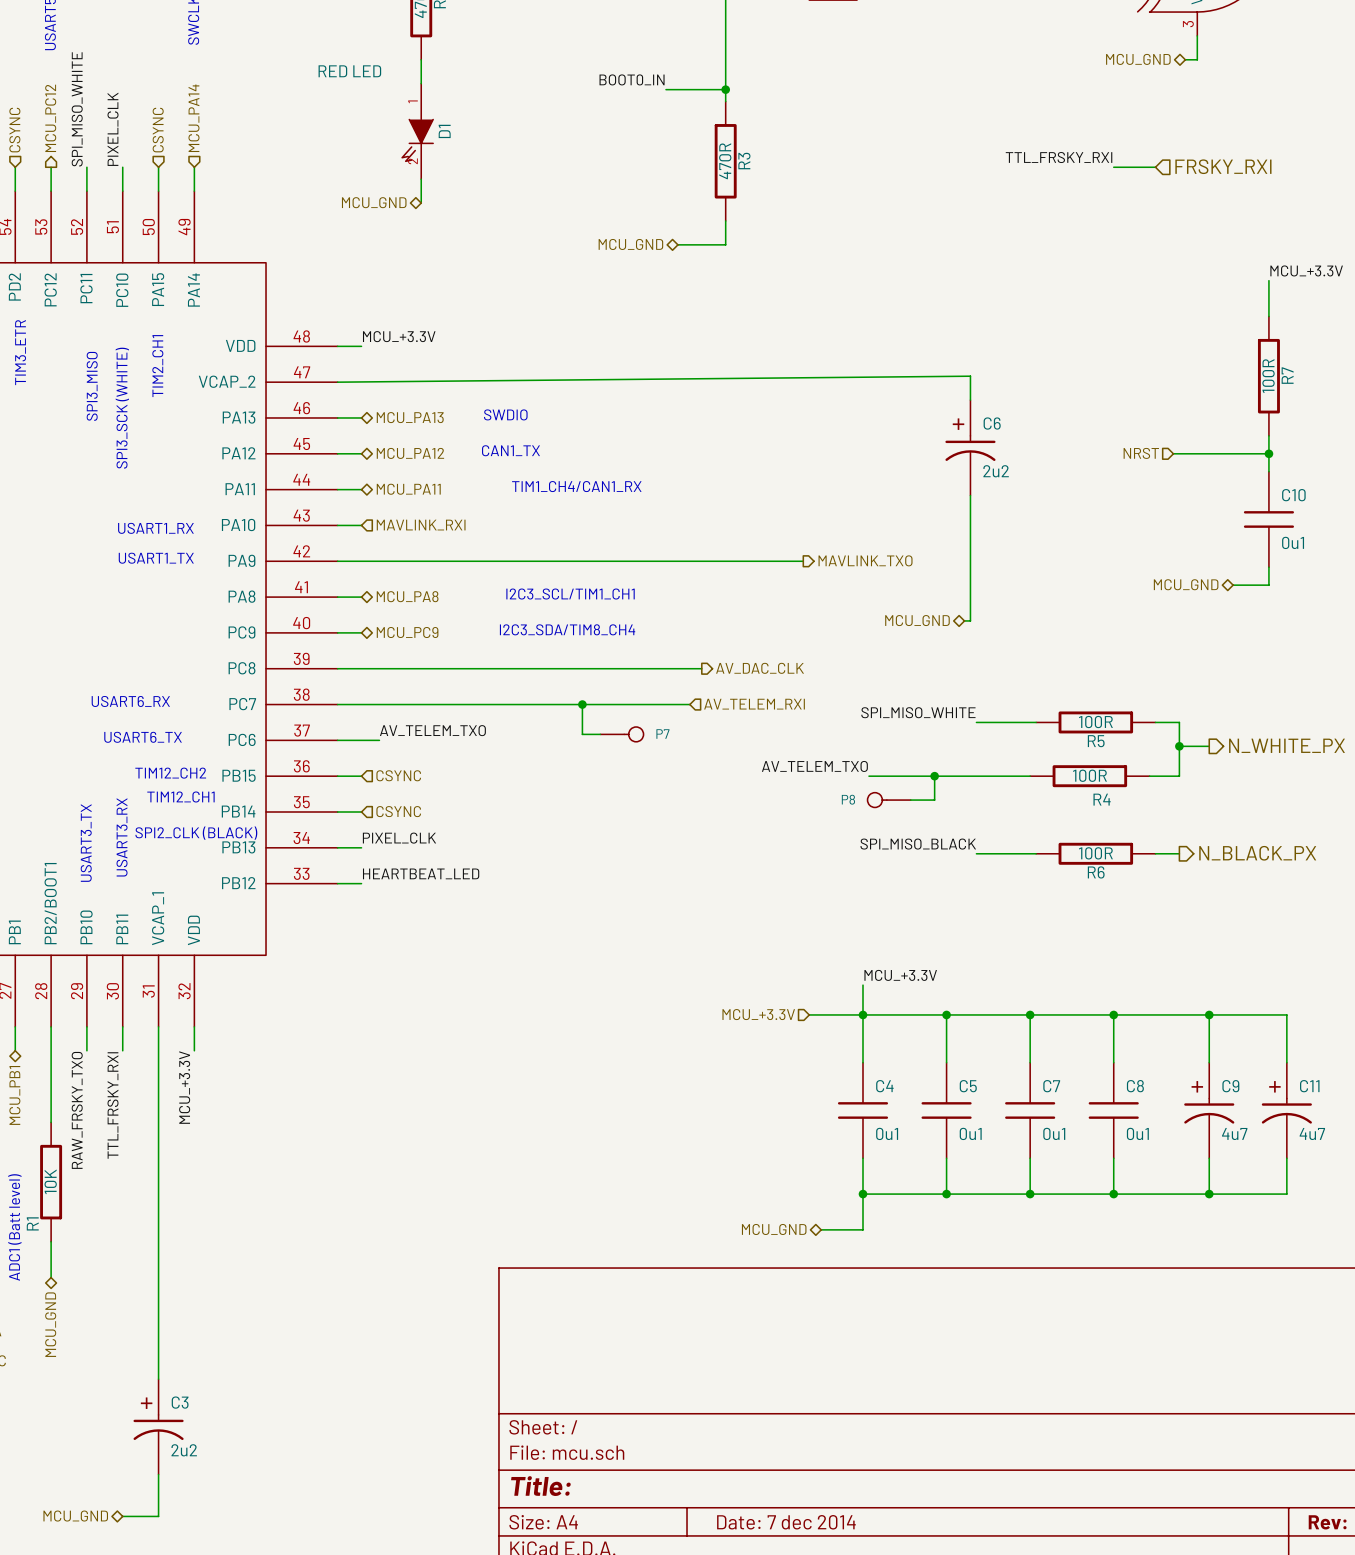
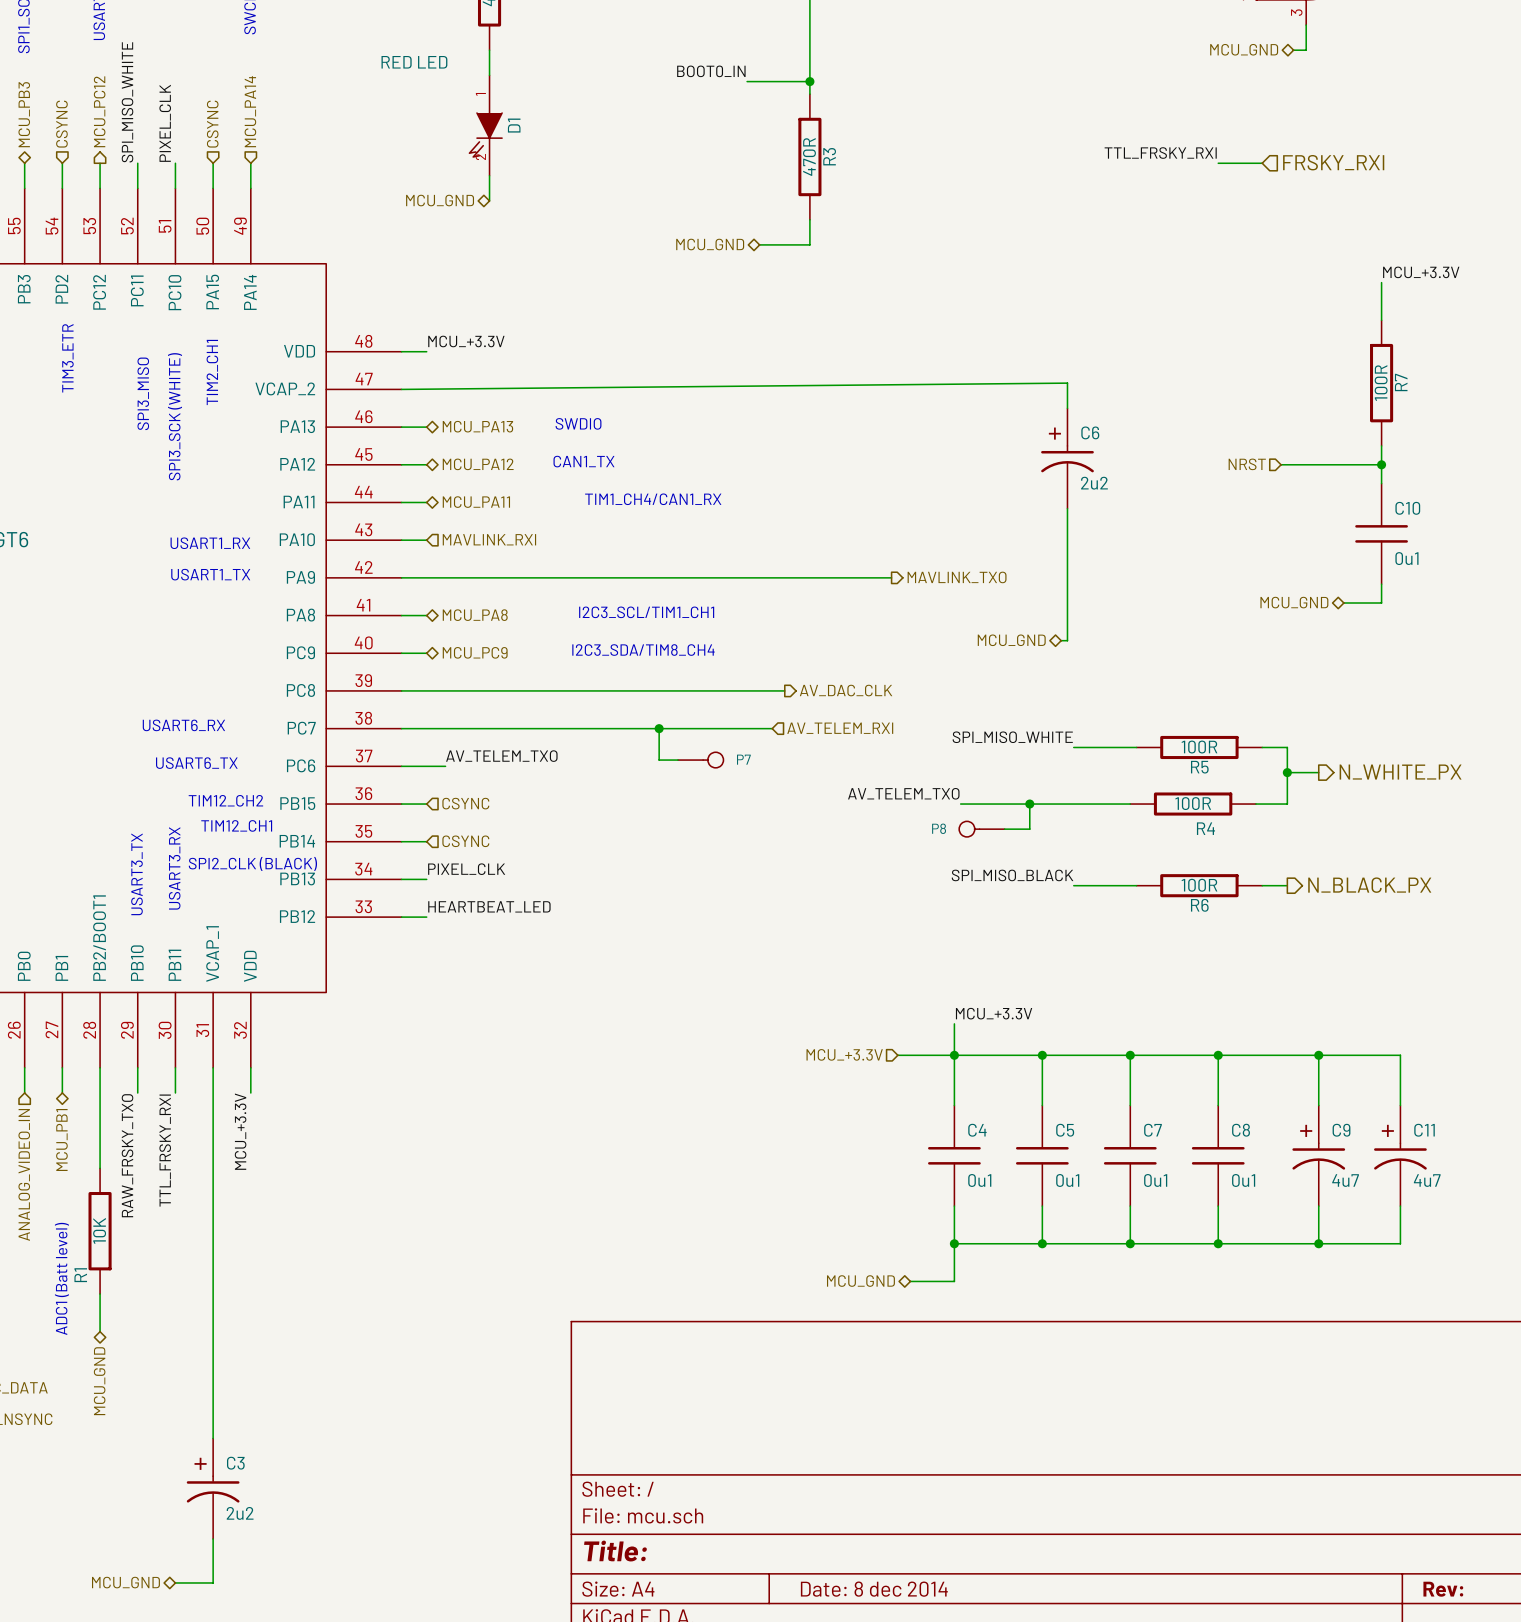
title block: Date: 7 dec 2014 (786, 1522) -> Date: 8 dec 2014 (874, 1589)

